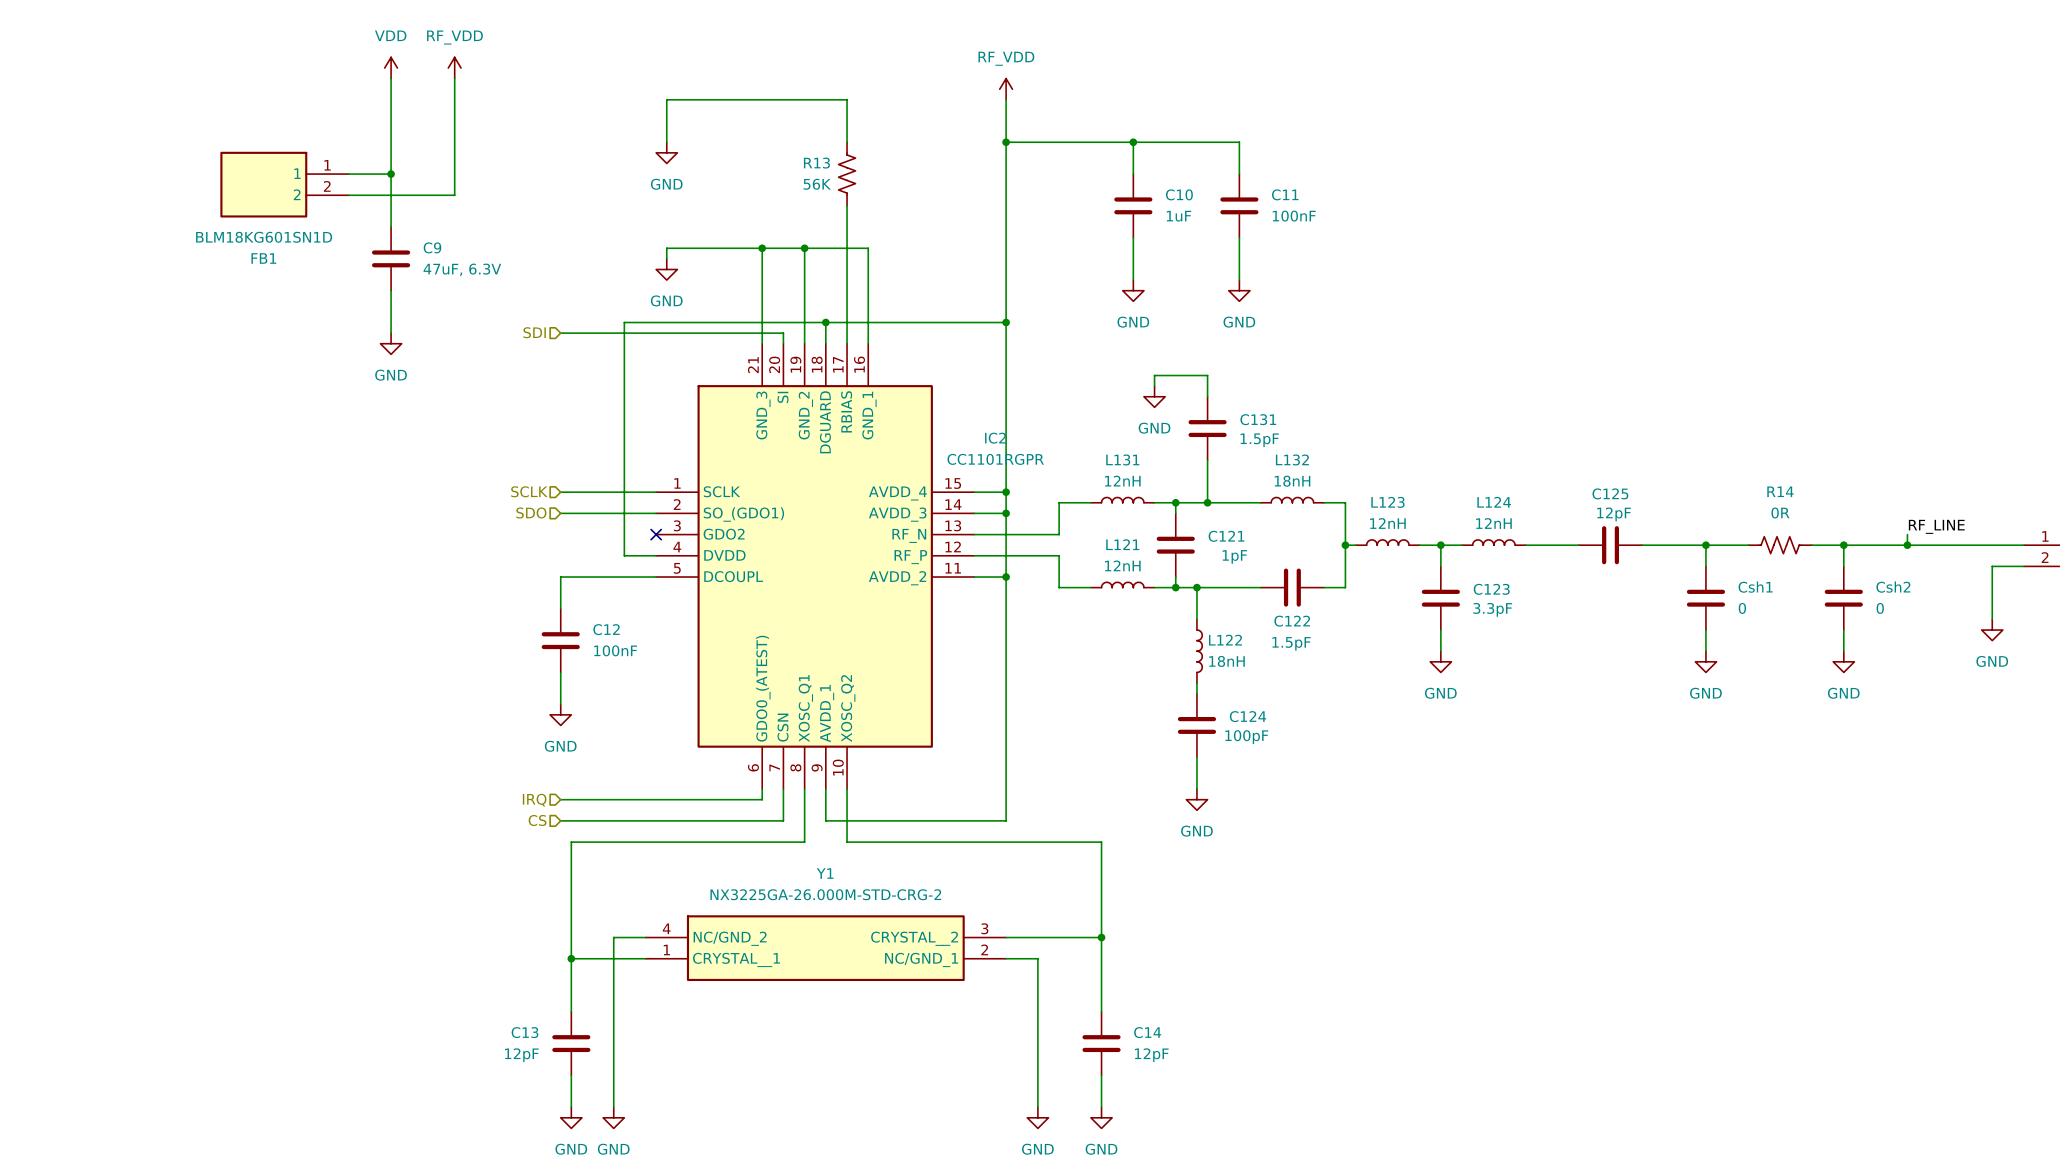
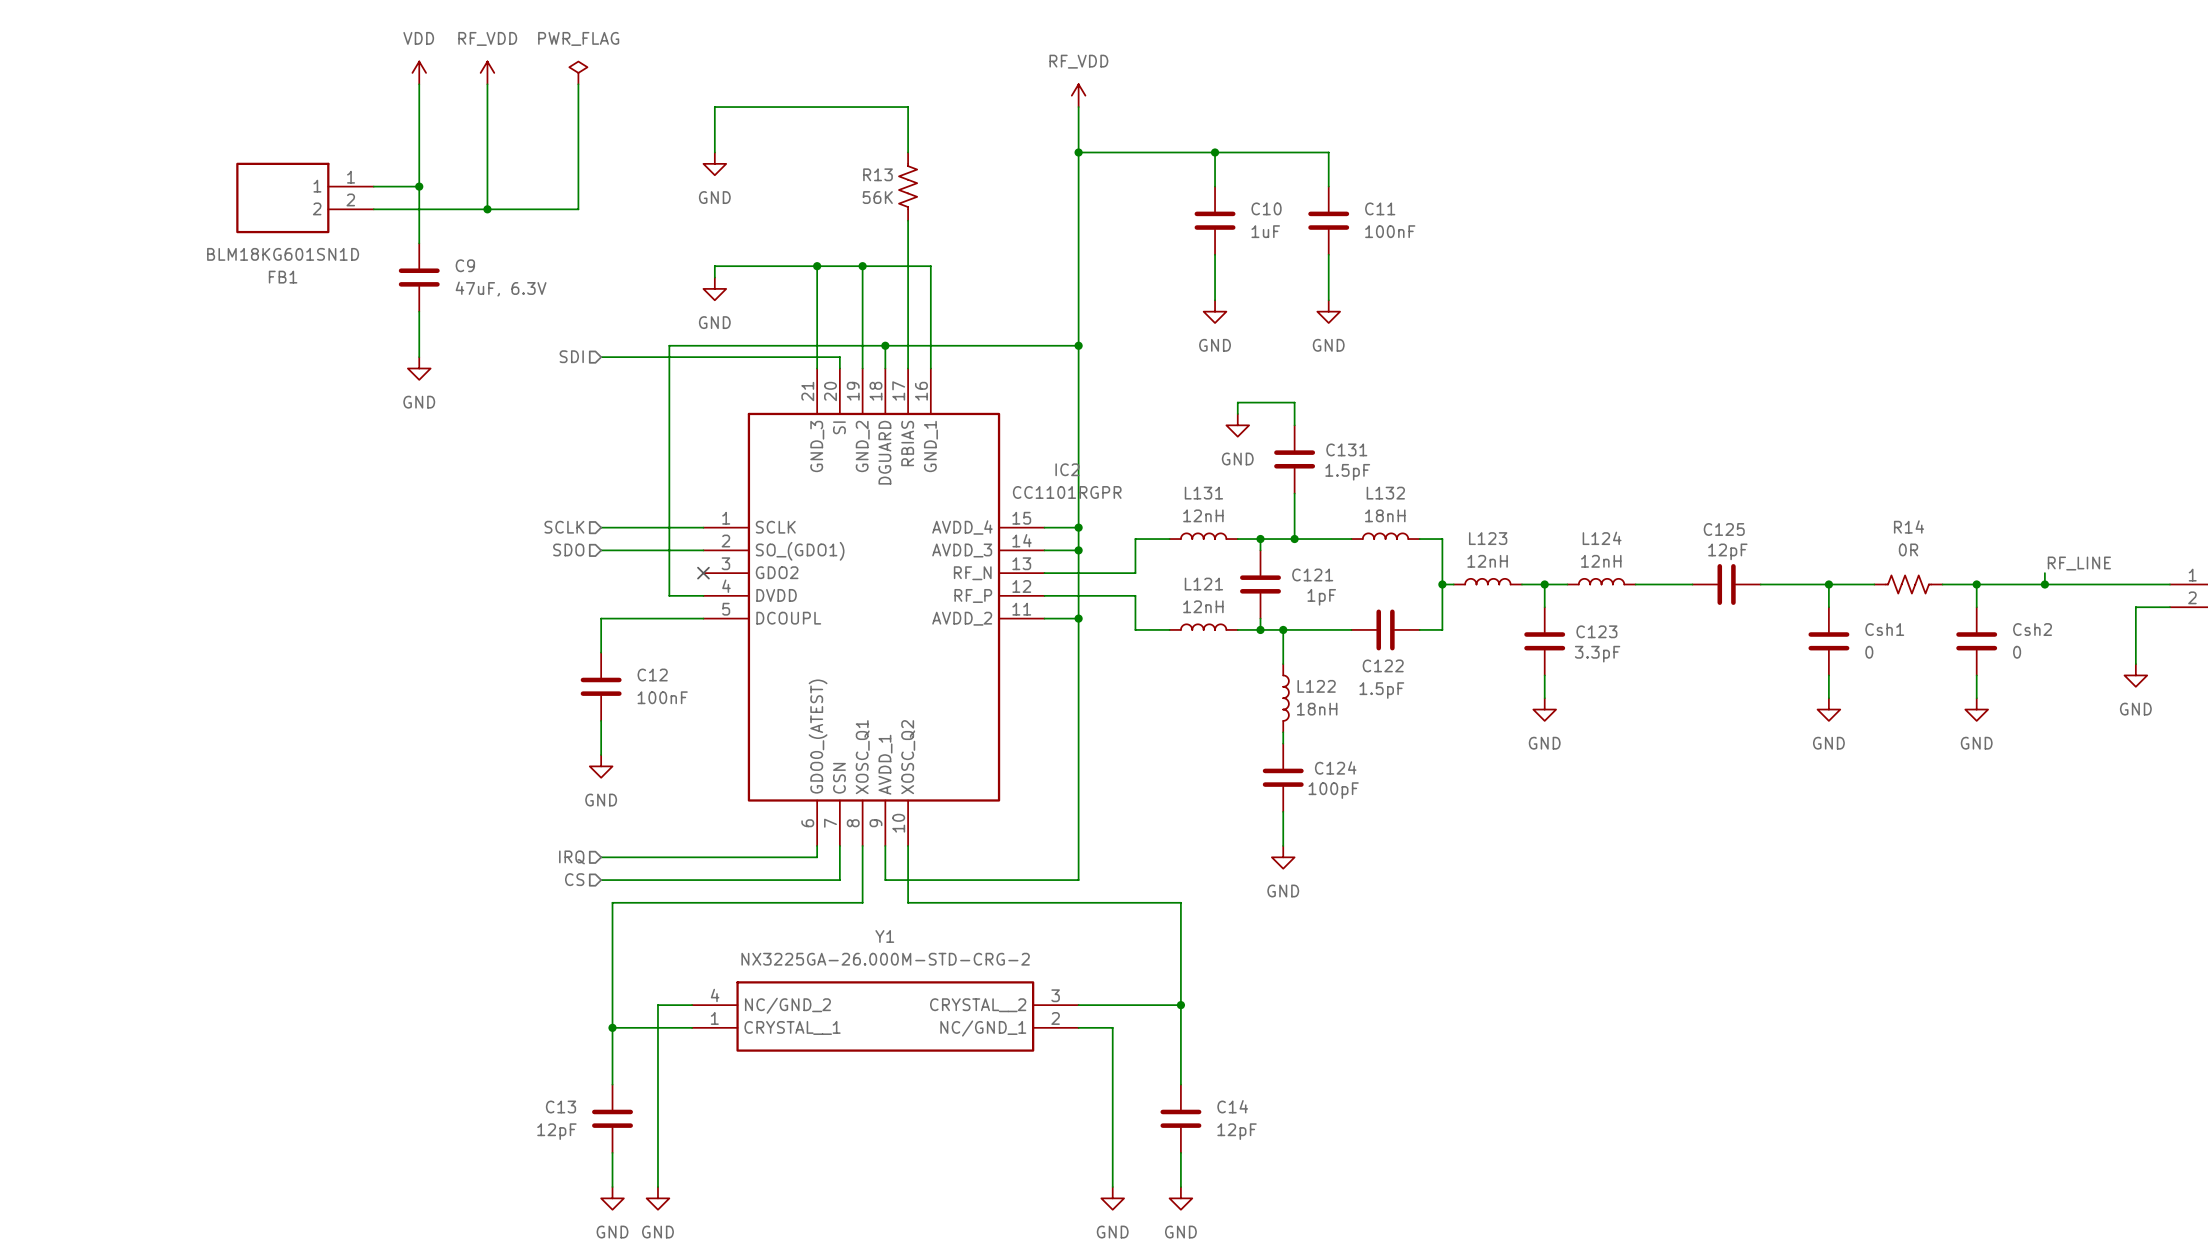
power symbol: none -> PWR_FLAG (578, 72)
wire: none -> (578, 84) (578, 209) (487, 209)
junction: none -> (487, 209)

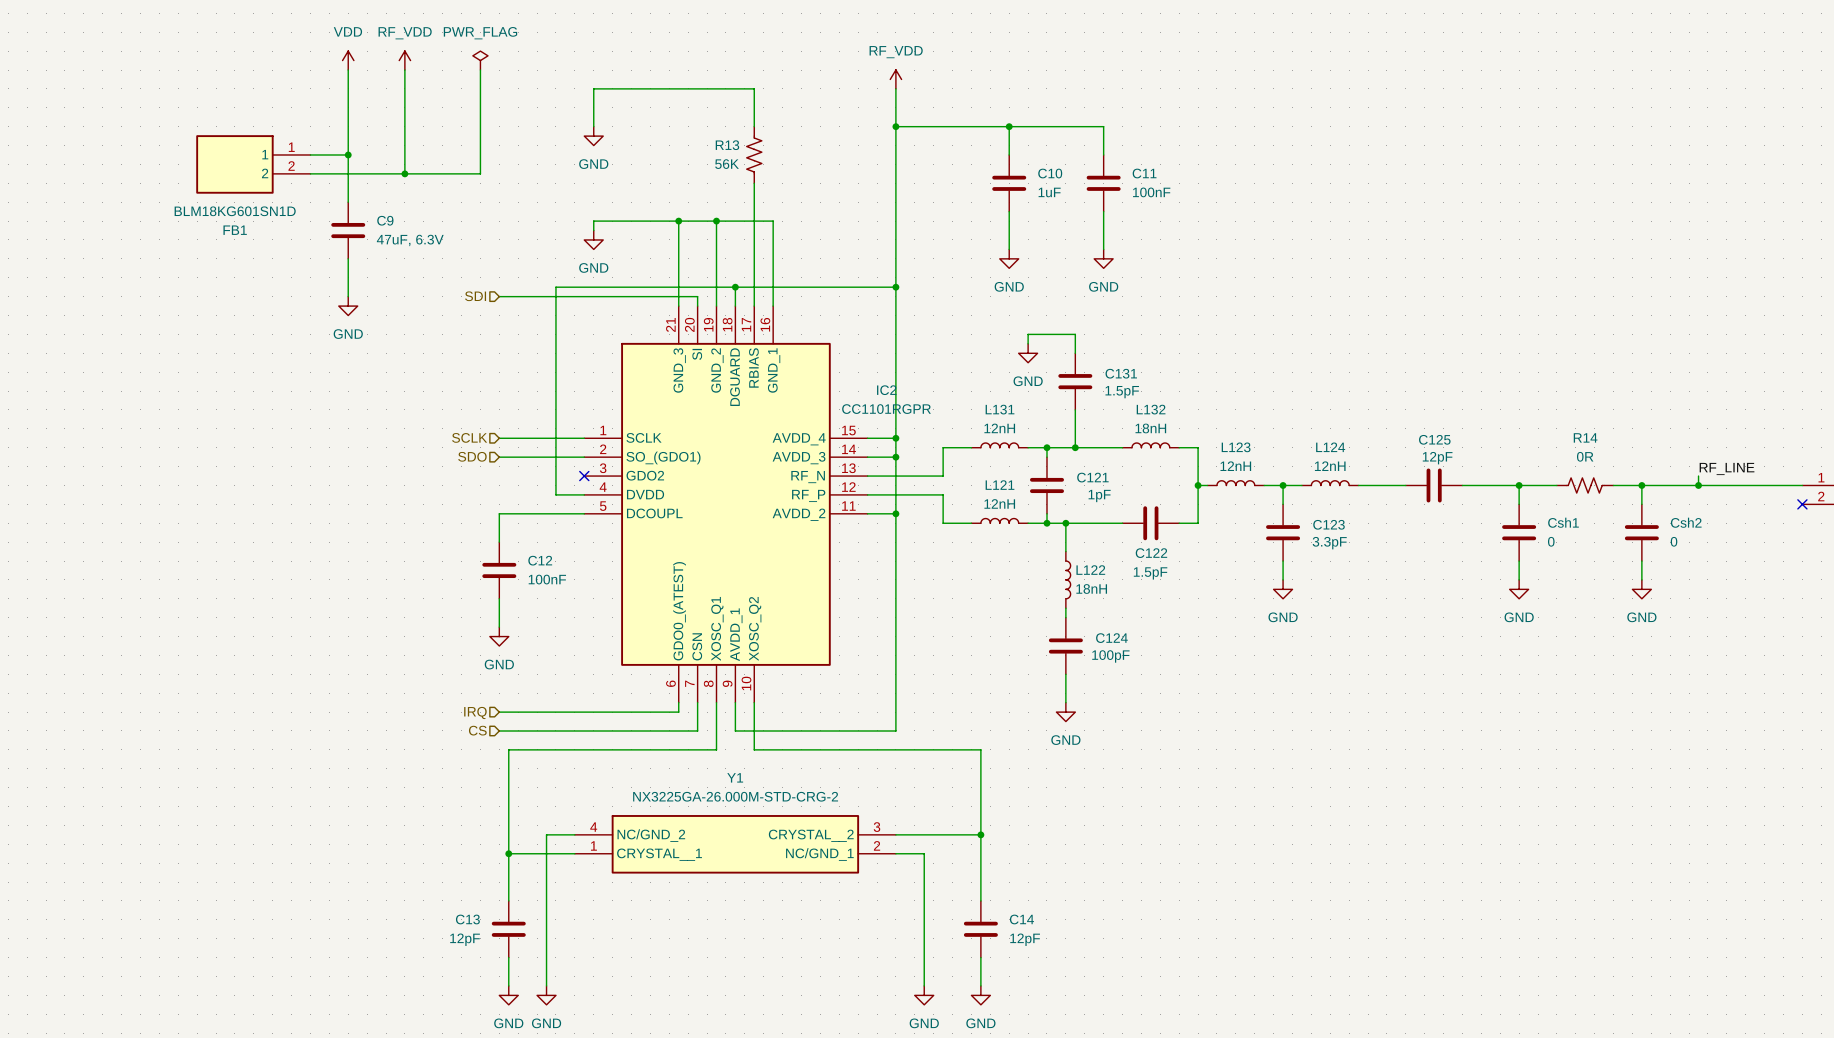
wire: (2169, 607) (2135, 607) (2135, 664) -> none
no-connect mark: none -> (1802, 504)
power symbol: GND (2135, 675) -> none

